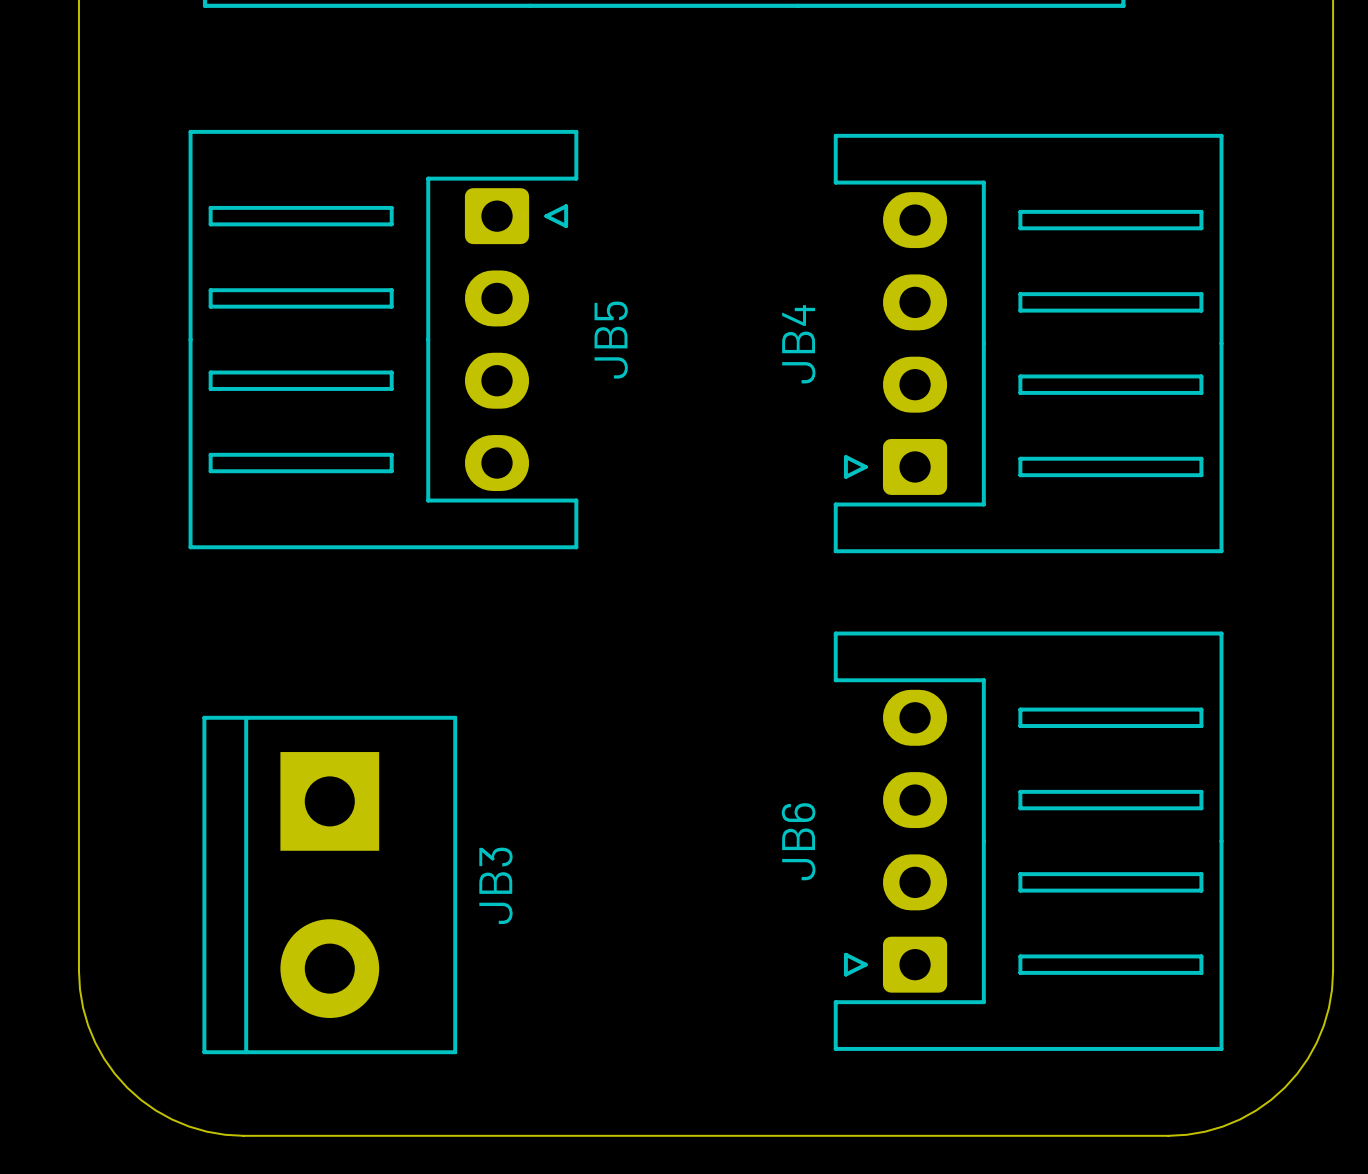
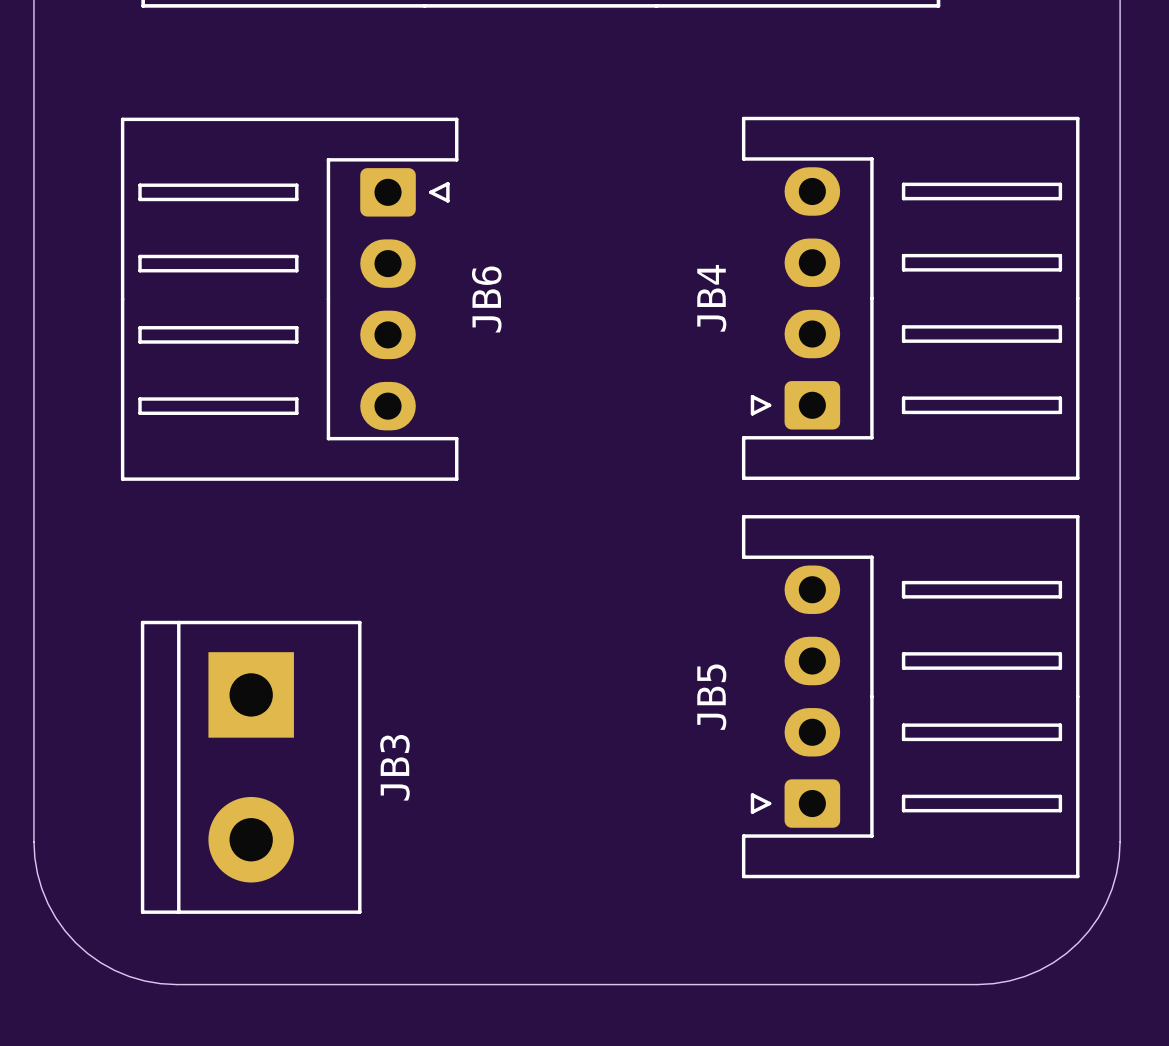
JB5 rotation: 0° (383, 339) -> 180° (910, 696)
JB5 position: (383, 339) -> (910, 696)
JB4 position: (1028, 343) -> (910, 298)
JB6 rotation: 0° (1028, 841) -> 180° (289, 299)
JB6 position: (1028, 841) -> (289, 299)

